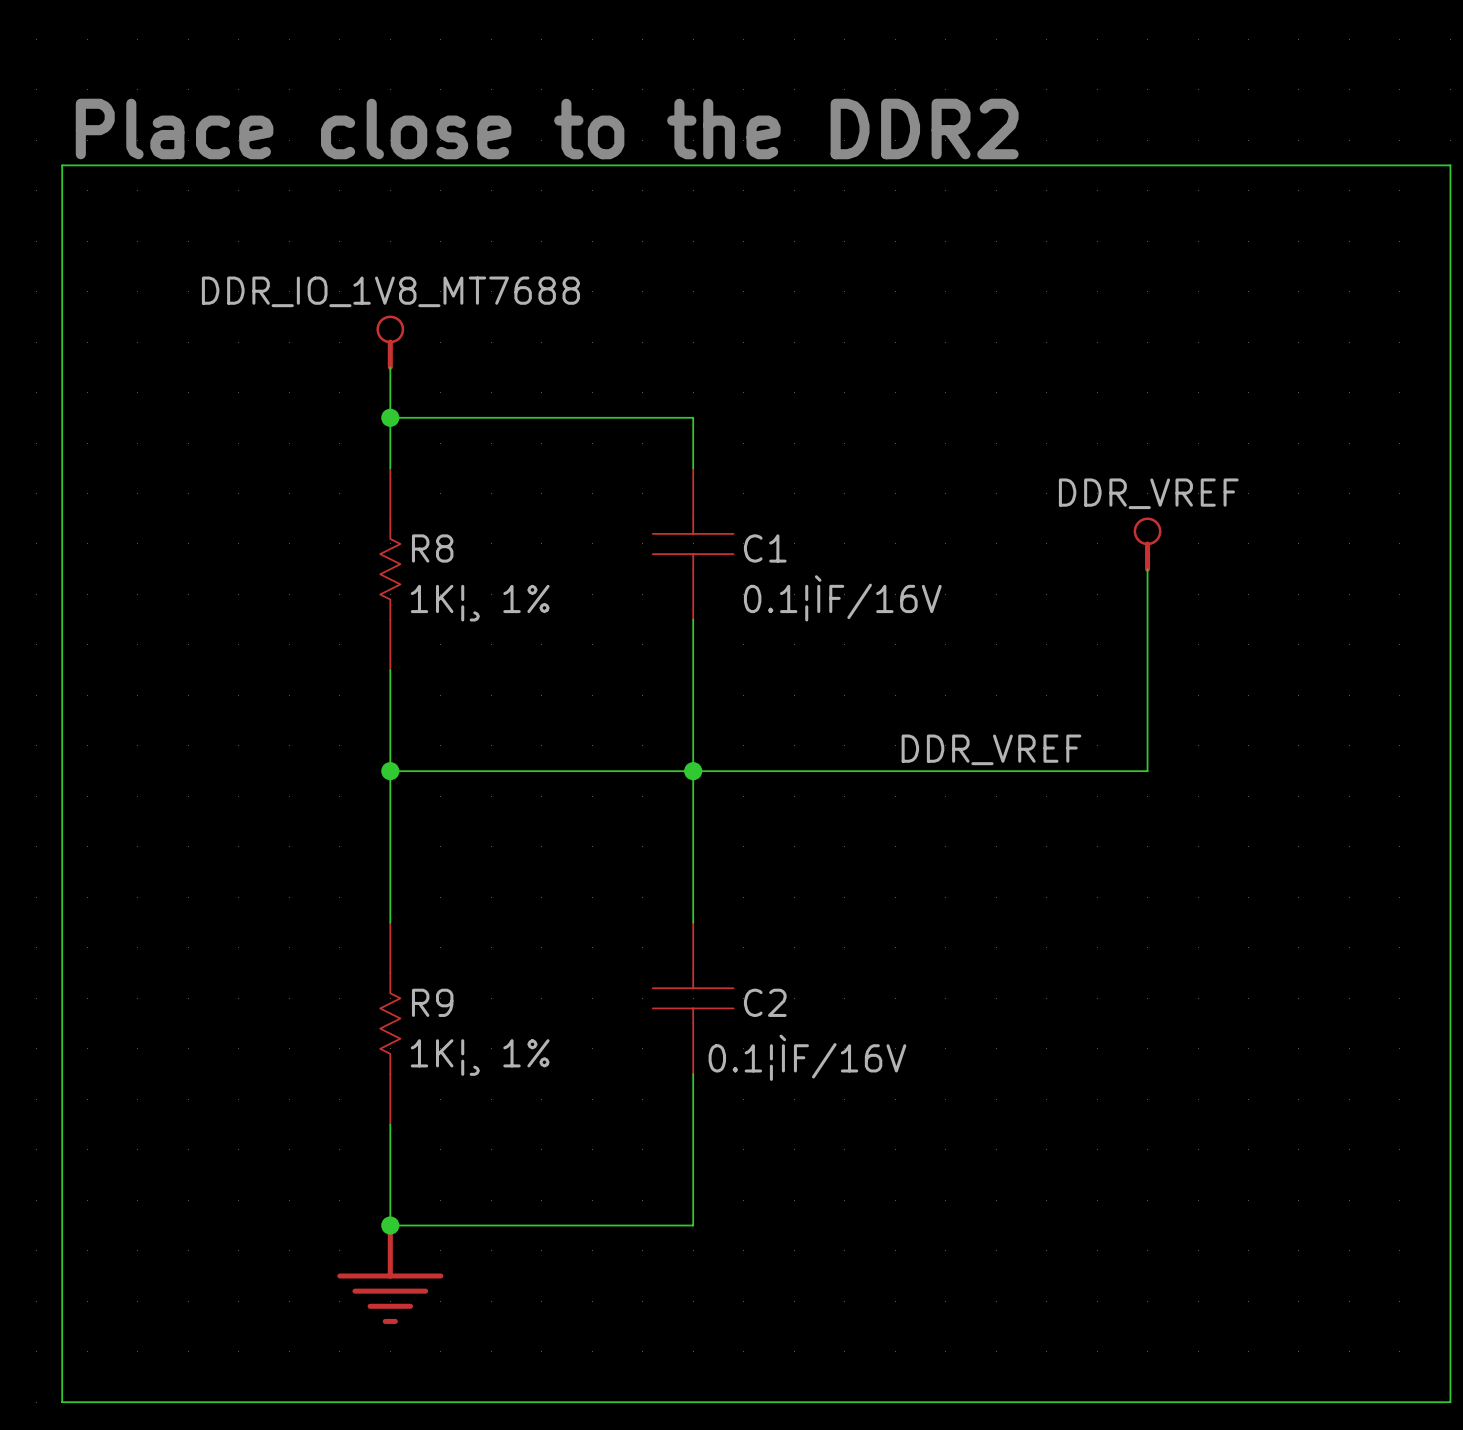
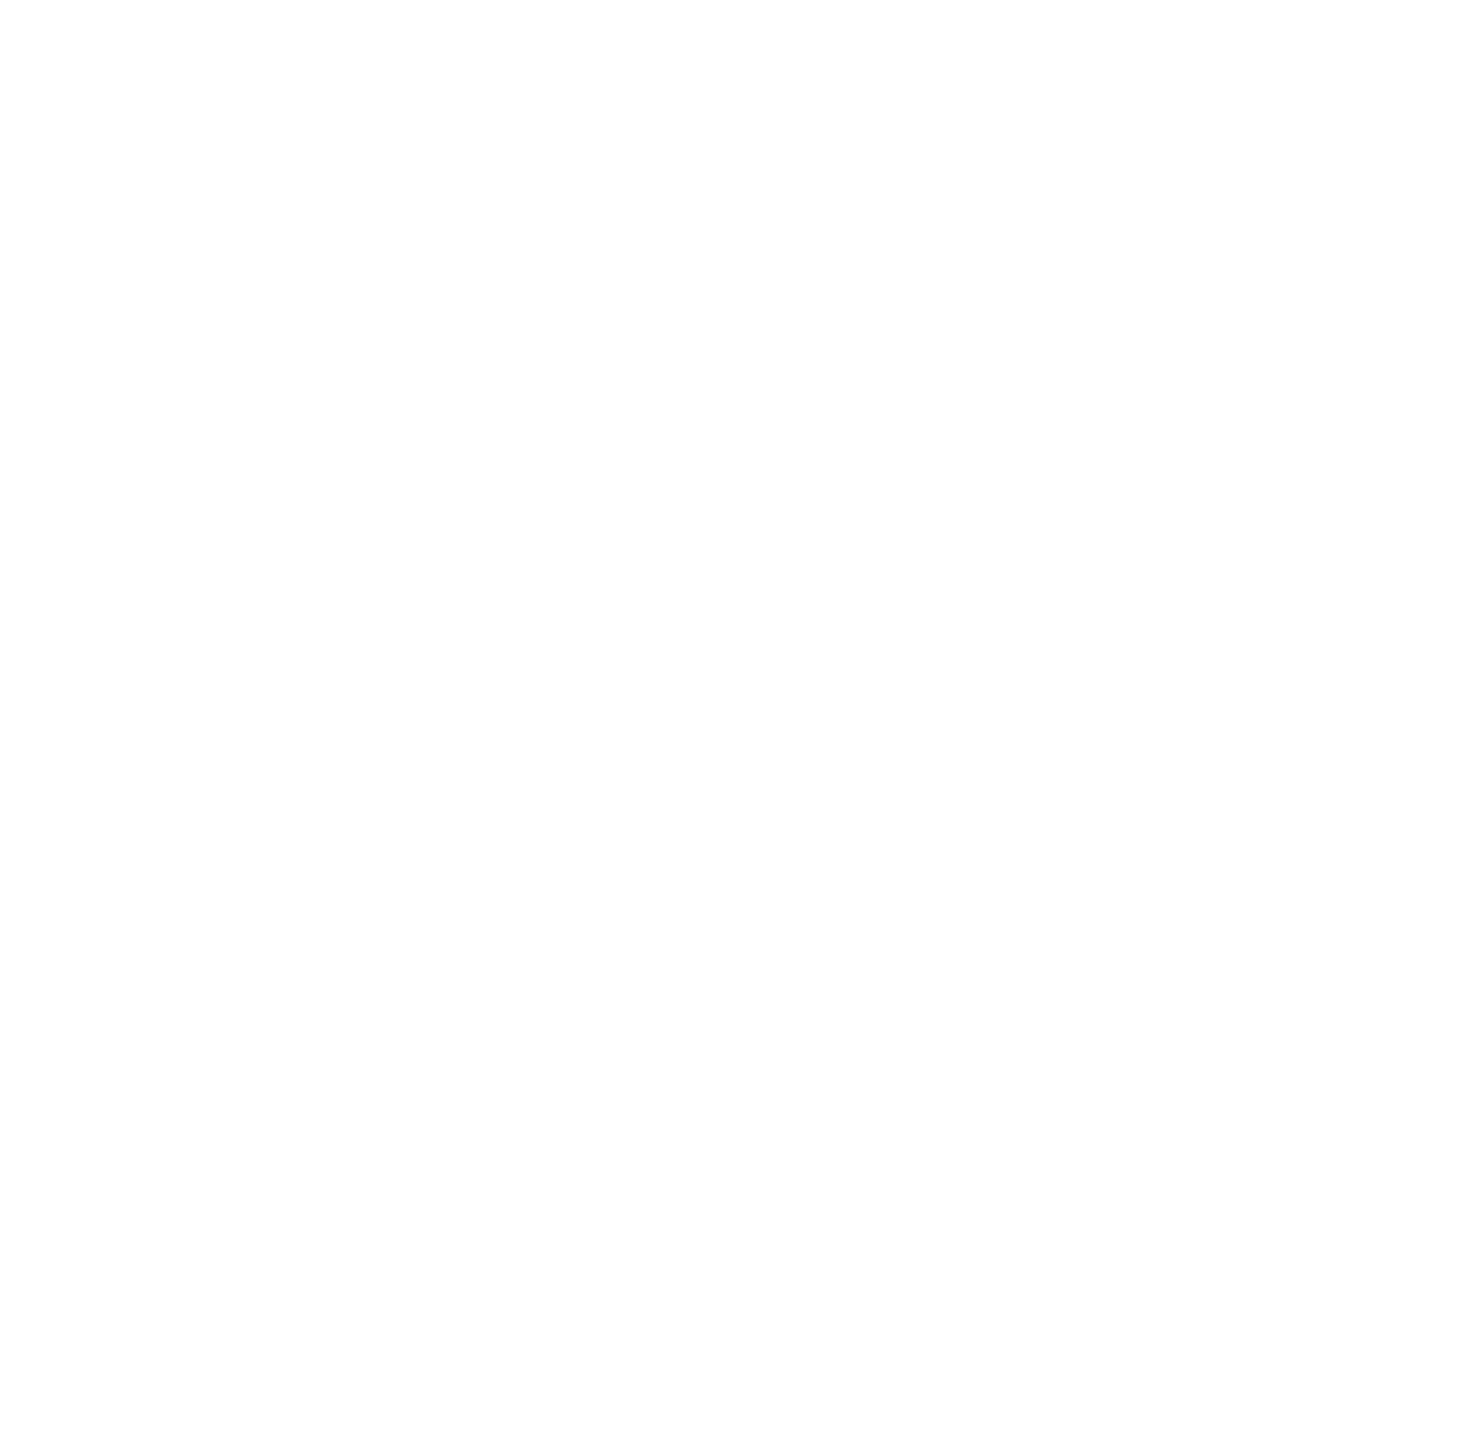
text: Place close to the DDR2 (547, 128) -> none
wire: (62, 165) (62, 1402) (1450, 1402) (1450, 165) (62, 165) -> none
power symbol: DDR_IO_1V8_MT7688 (390, 342) -> none
wire: (390, 367) (390, 468) -> none
wire: (390, 417) (693, 417) (693, 468) -> none
junction: (390, 417) -> none
C1: (693, 543) -> none
power symbol: DDR_VREF (1147, 544) -> none
R8: (390, 569) -> none
wire: (1147, 569) (1147, 771) (390, 771) -> none
wire: (693, 619) (693, 922) -> none
wire: (390, 670) (390, 922) -> none
label: DDR_VREF (991, 749) -> none
junction: (390, 771) -> none
junction: (693, 771) -> none
C2: (693, 998) -> none
R9: (390, 1023) -> none
wire: (693, 1074) (693, 1225) (390, 1225) (390, 1124) -> none
junction: (390, 1225) -> none
power symbol: (390, 1273) -> none

